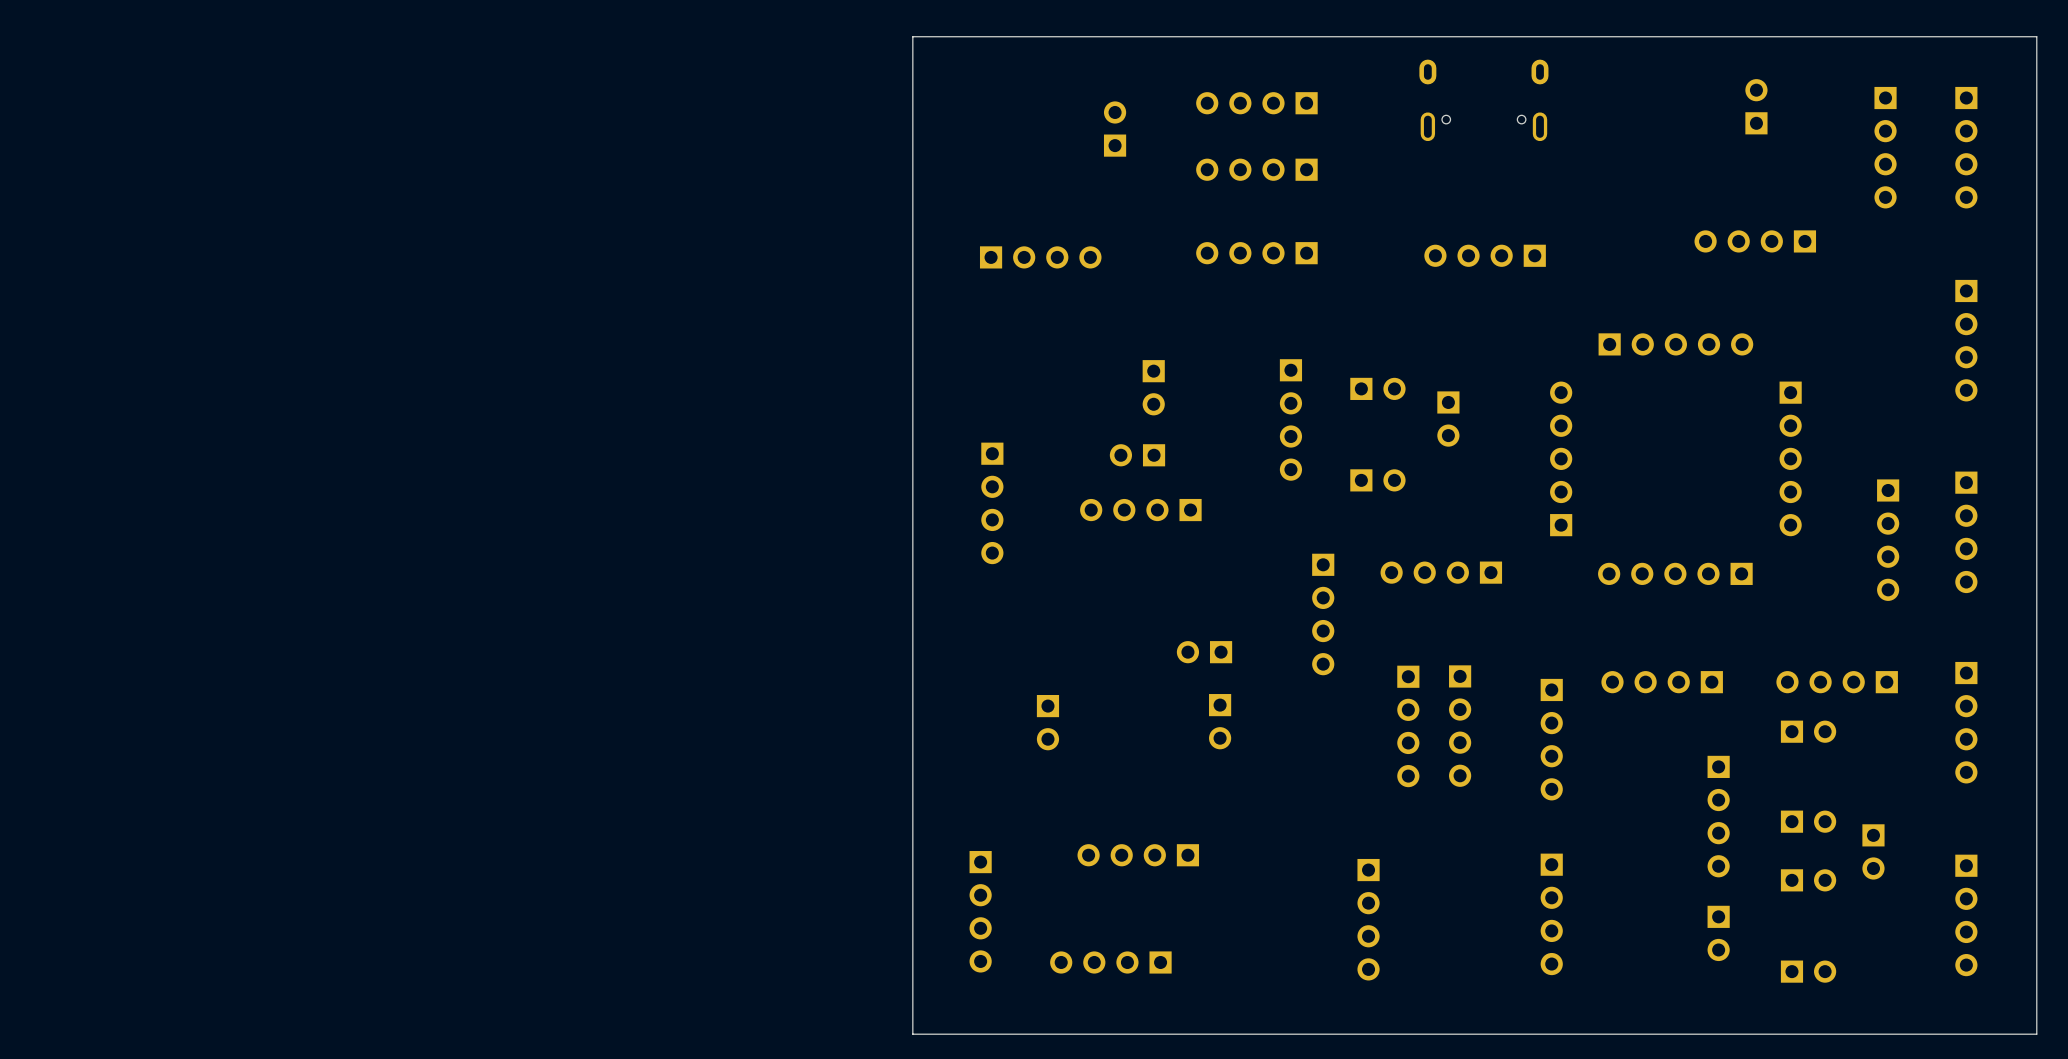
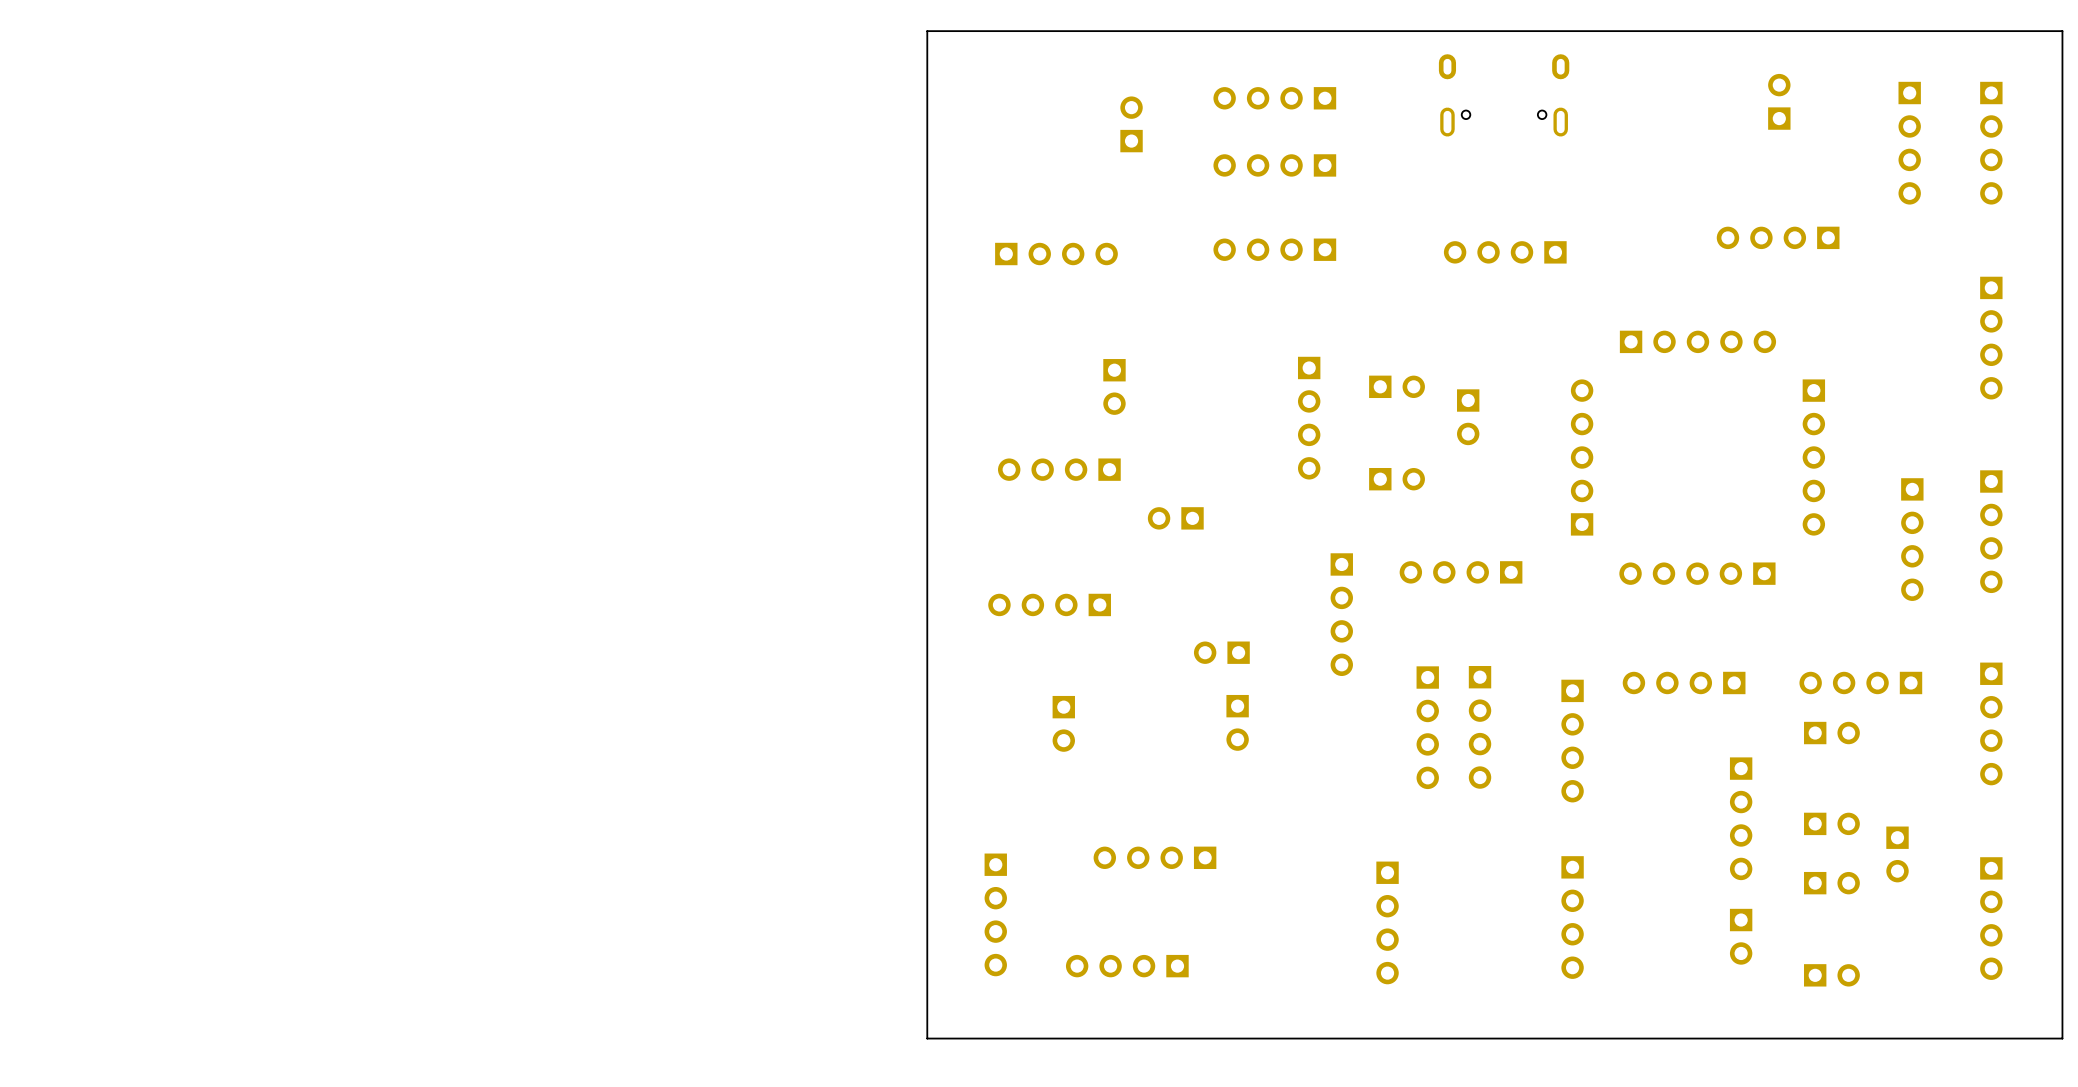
part: (1153, 387) -> none
part: none -> (1114, 386)
part: (1137, 455) -> none
part: none -> (1059, 469)
part: (992, 503) -> none
part: (1140, 510) -> none
part: none -> (1175, 518)
part: none -> (1049, 604)

